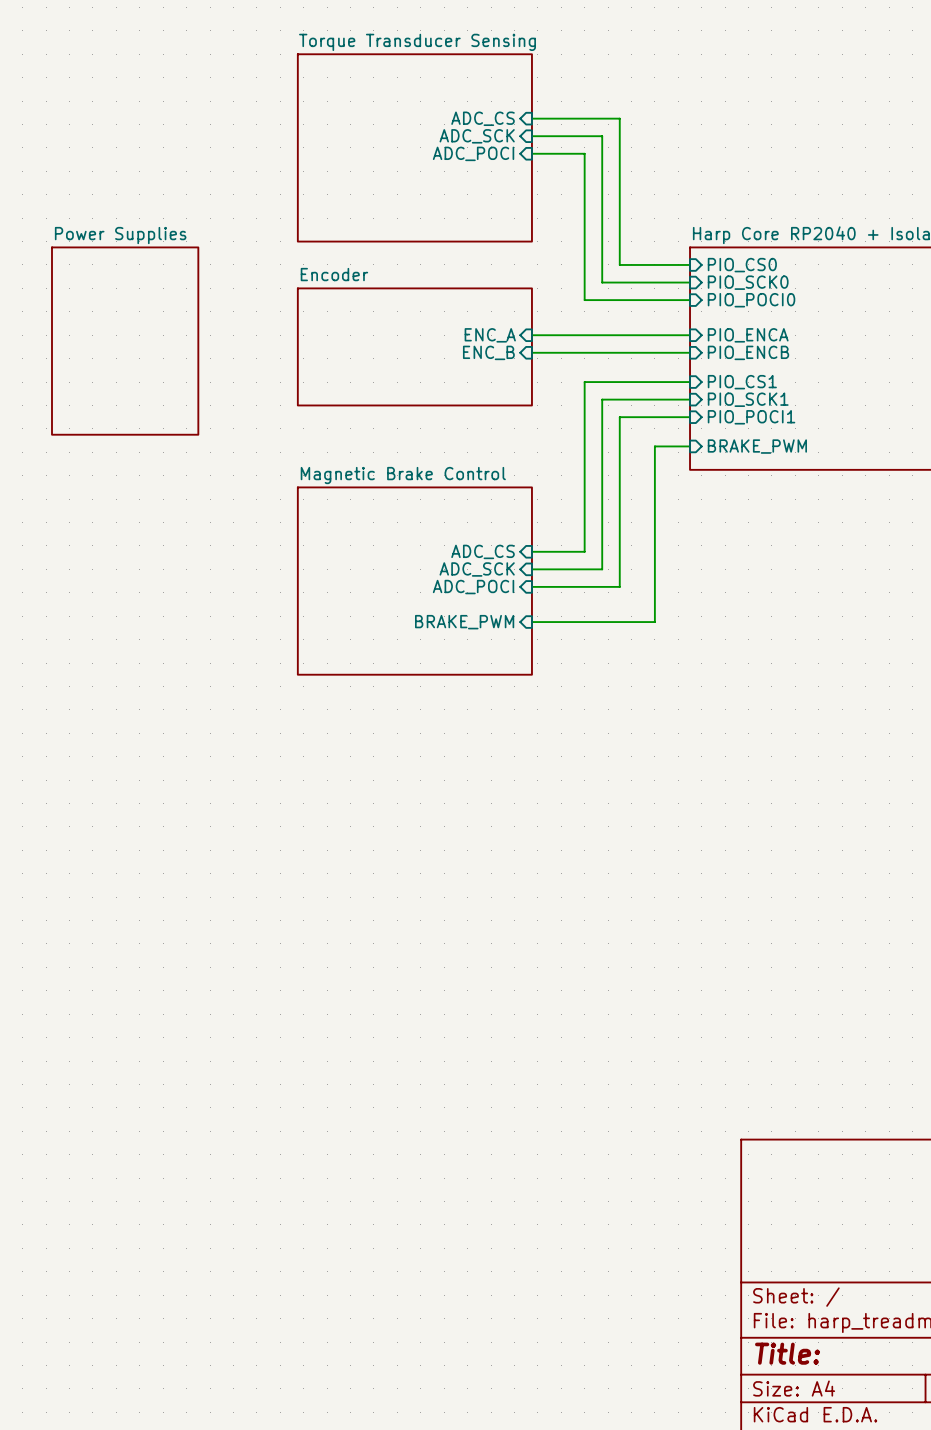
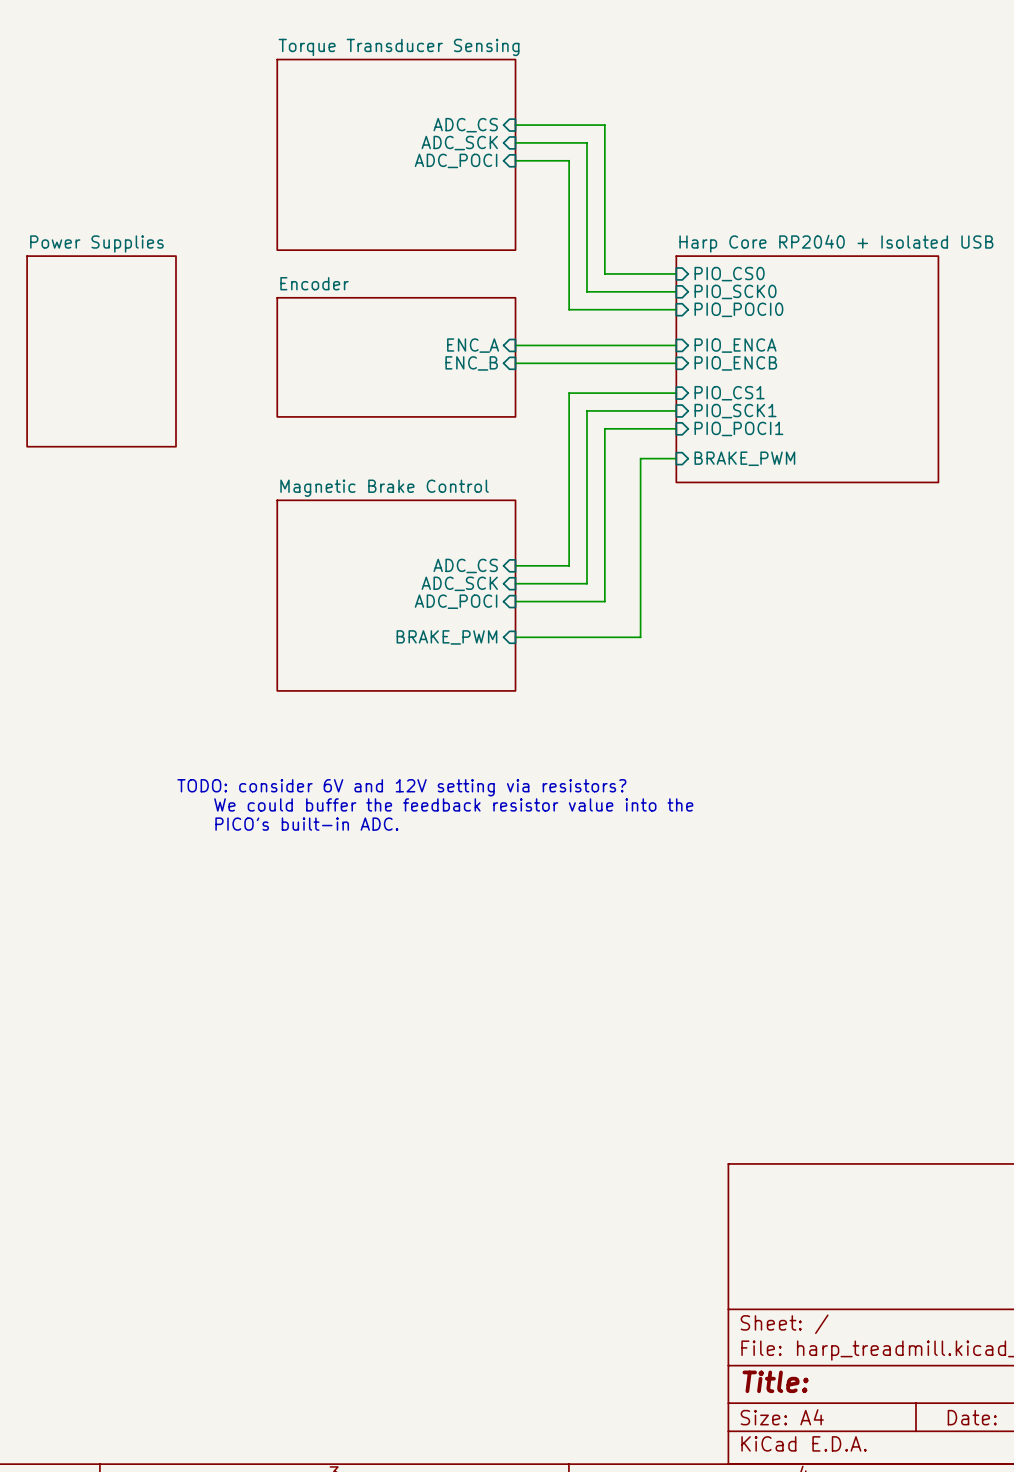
text: none -> TODO: consider 6V and 12V setting via resistors? (401, 787)
text: none -> We could buffer the feedback resistor value into the (453, 804)
text: none -> PICO's built-in ADC. (306, 824)

